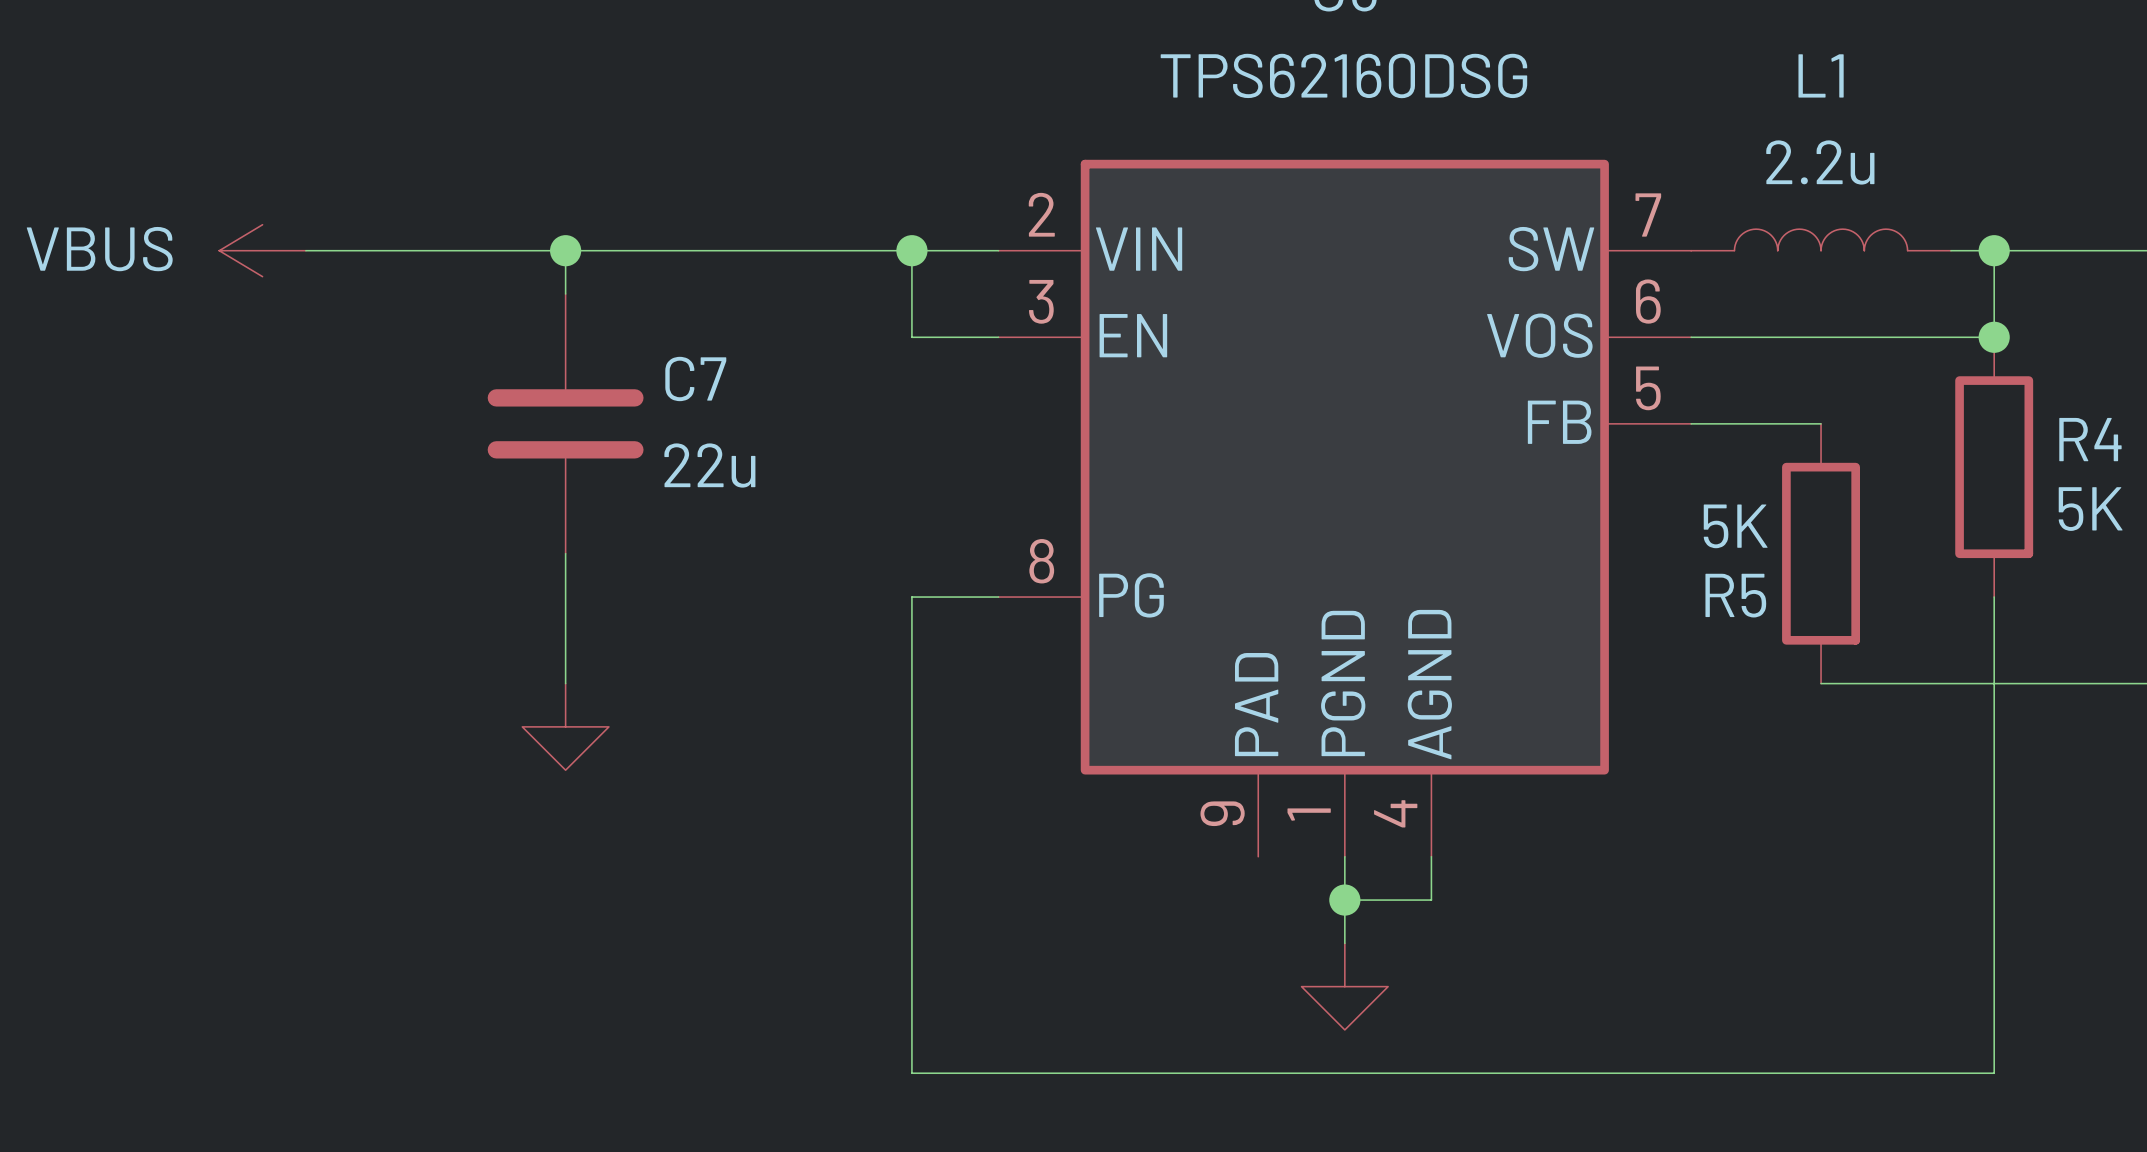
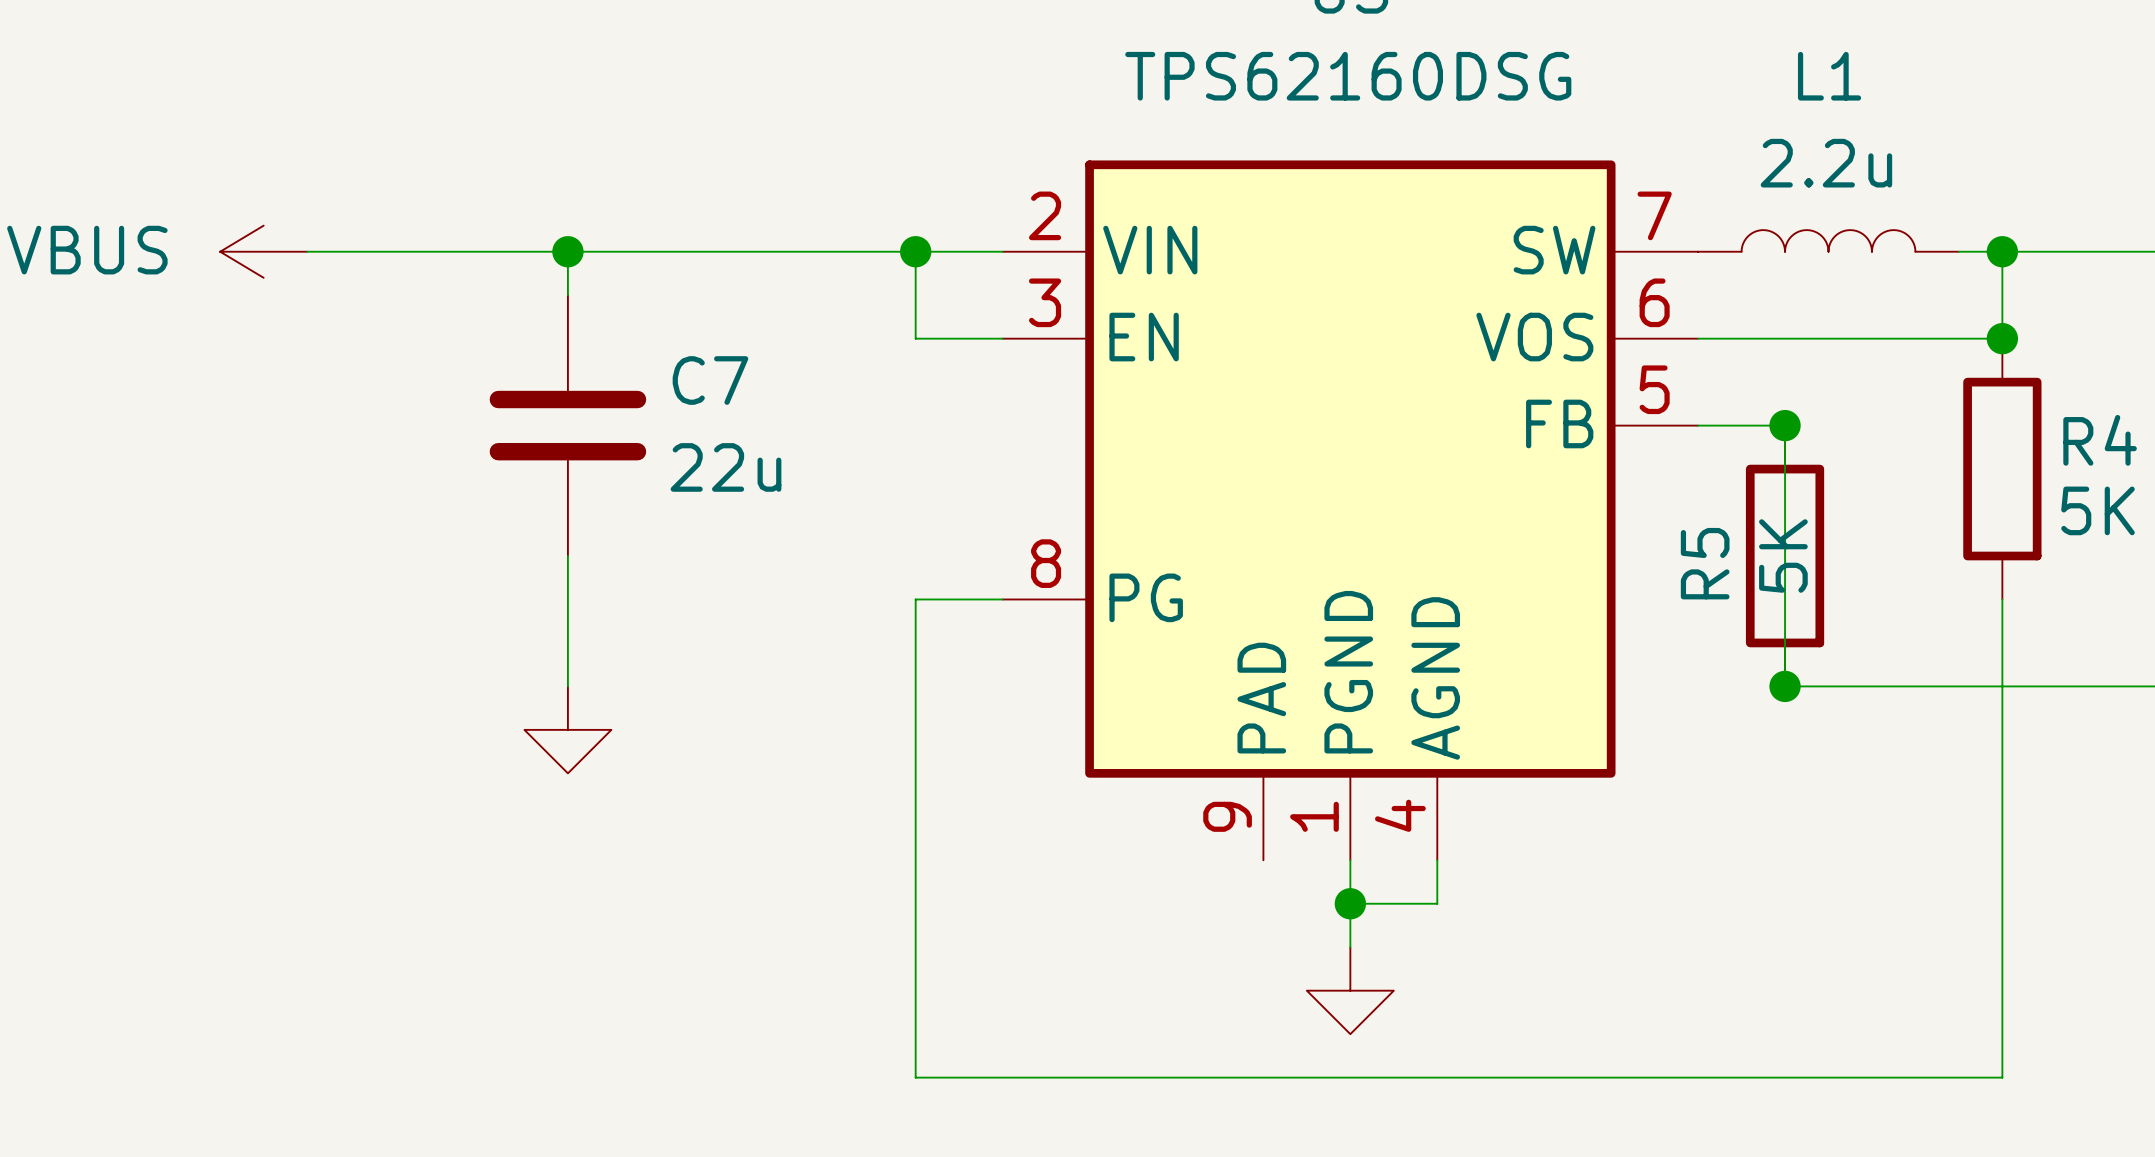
wire: (1777, 423) (1821, 423) -> (1785, 425) (1785, 686) (1828, 686)
junction: none -> (1785, 425)
R5 value rotation: 0° (1735, 526) -> 90° counterclockwise (1783, 556)
R5 position: (1821, 553) -> (1785, 556)
R5 name rotation: 0° (1735, 595) -> 90° counterclockwise (1705, 563)
junction: none -> (1785, 686)

